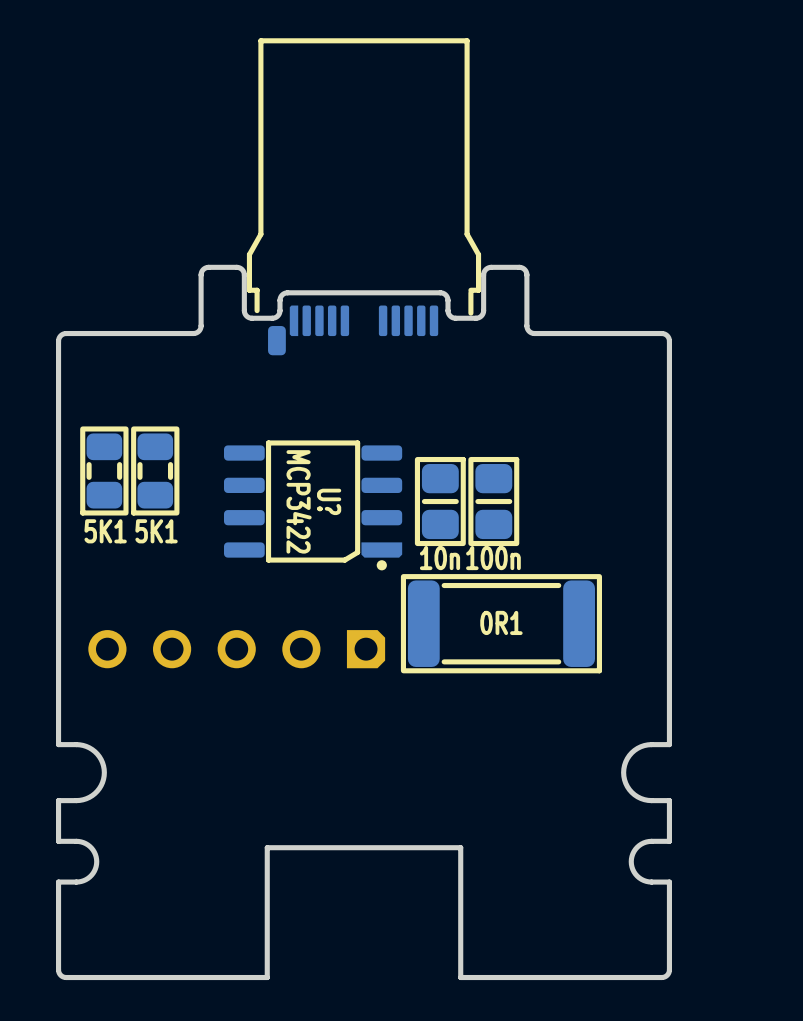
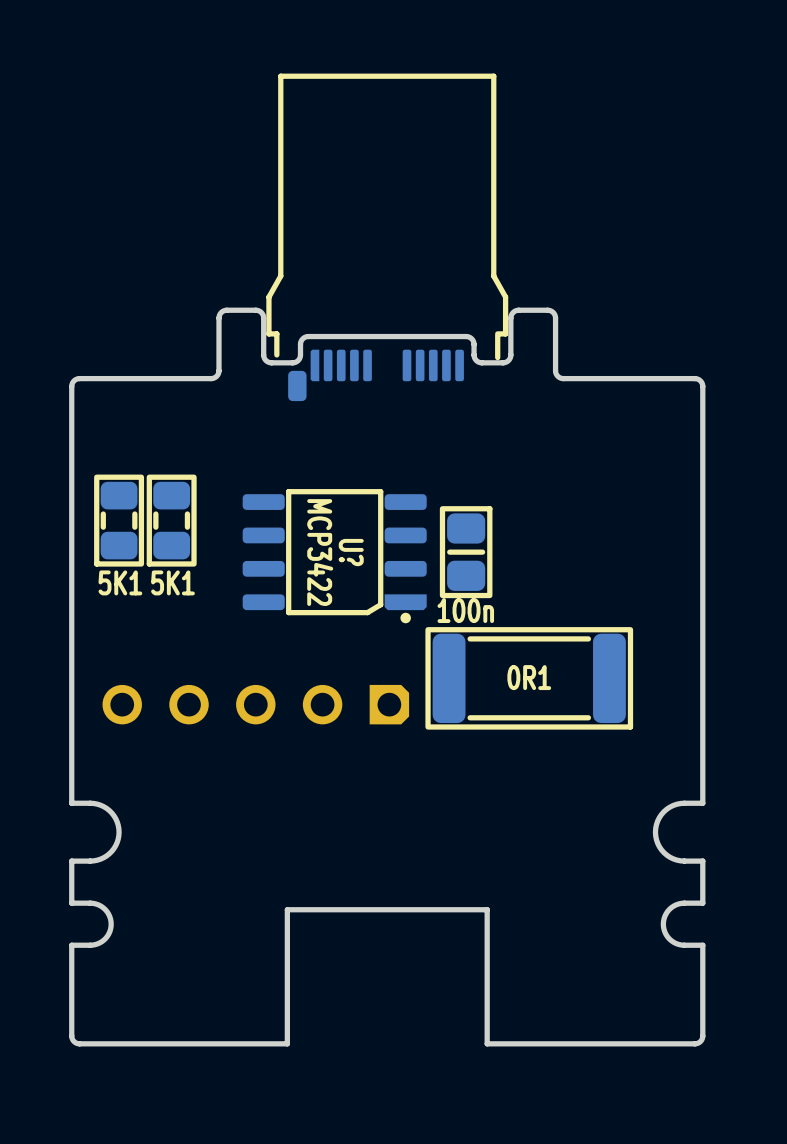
part: 100n (493, 501) -> none
part value: 10n (439, 558) -> 100n (465, 610)

